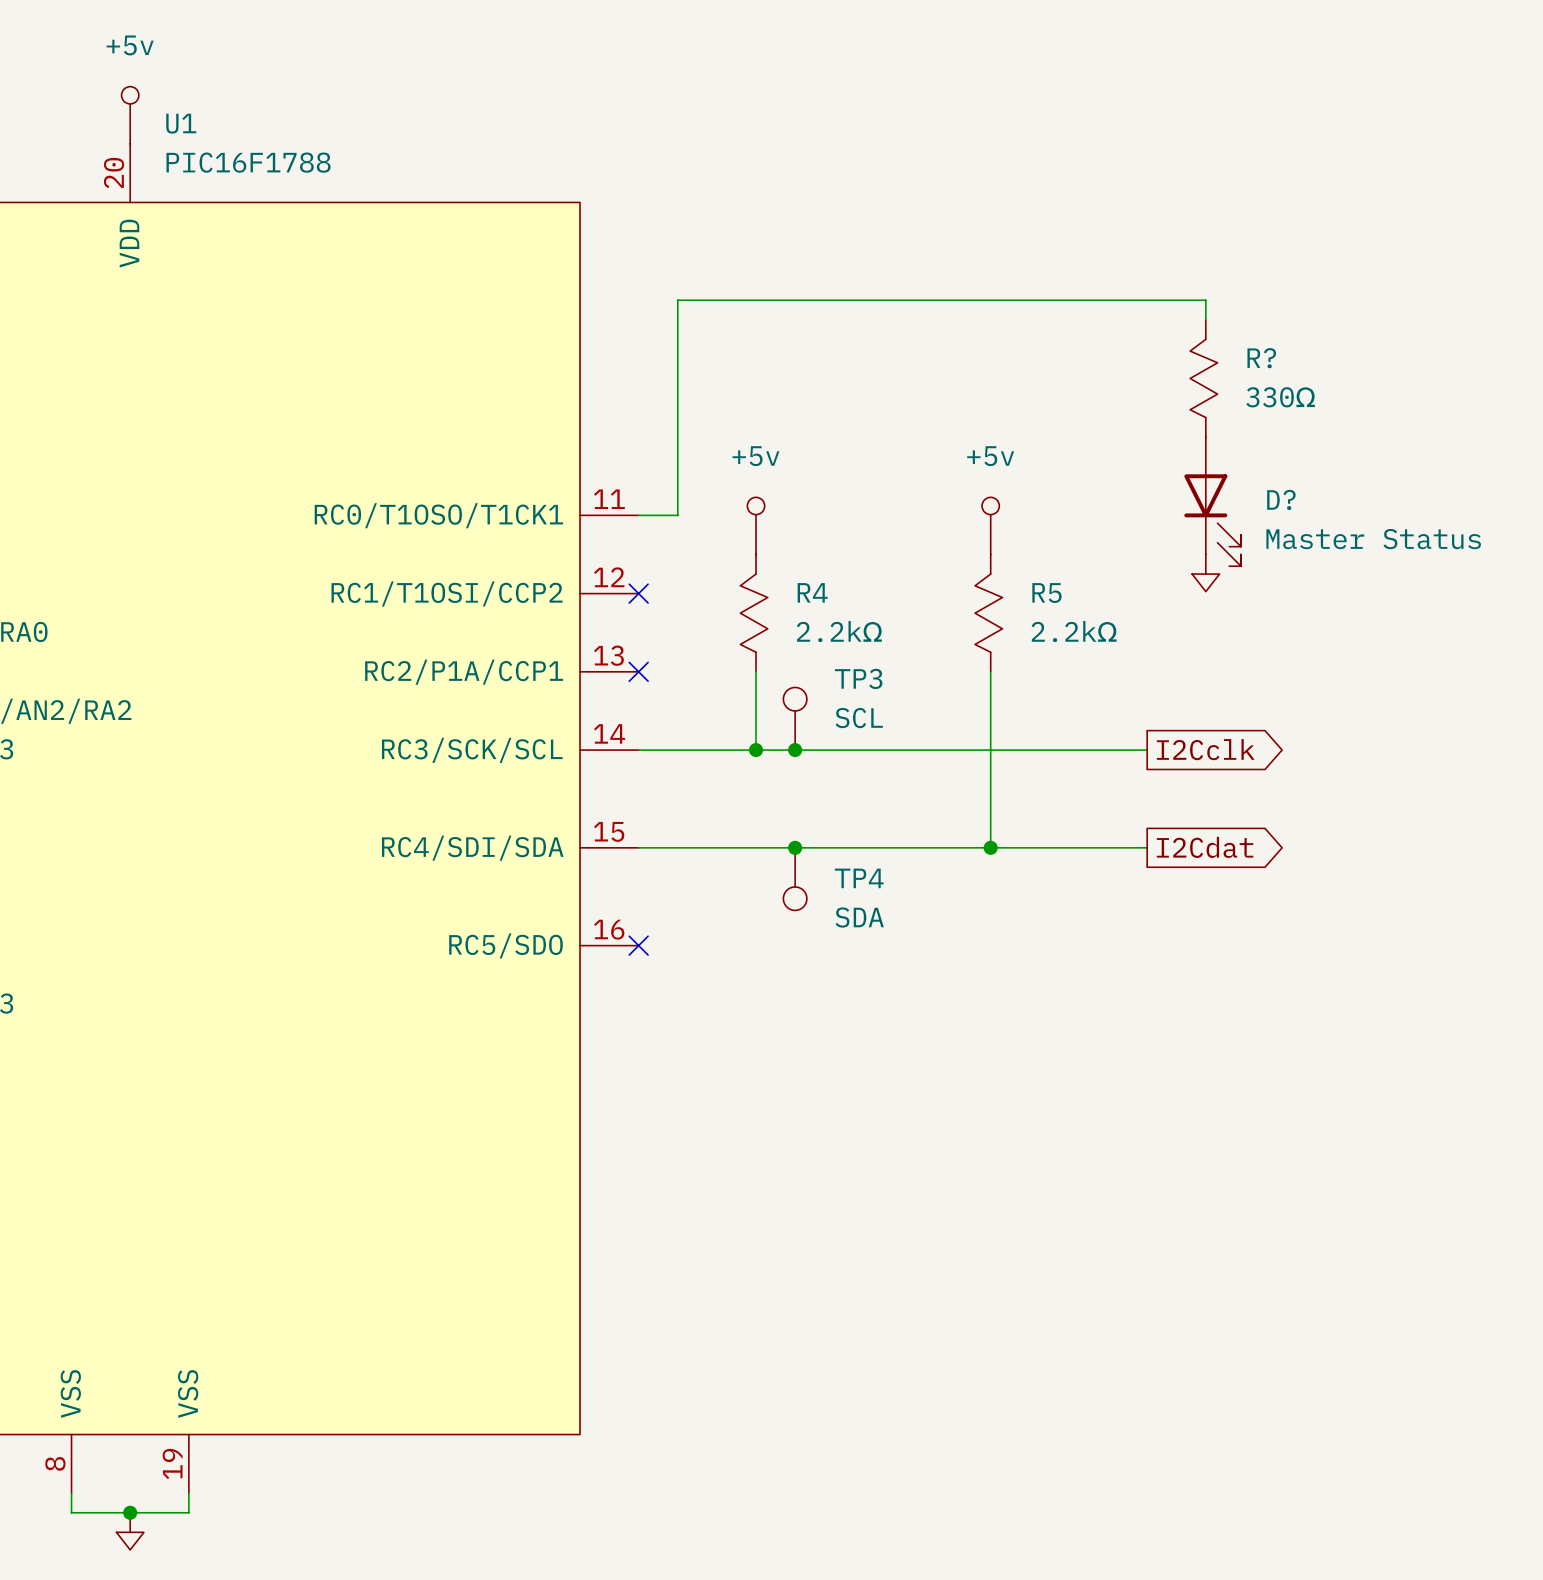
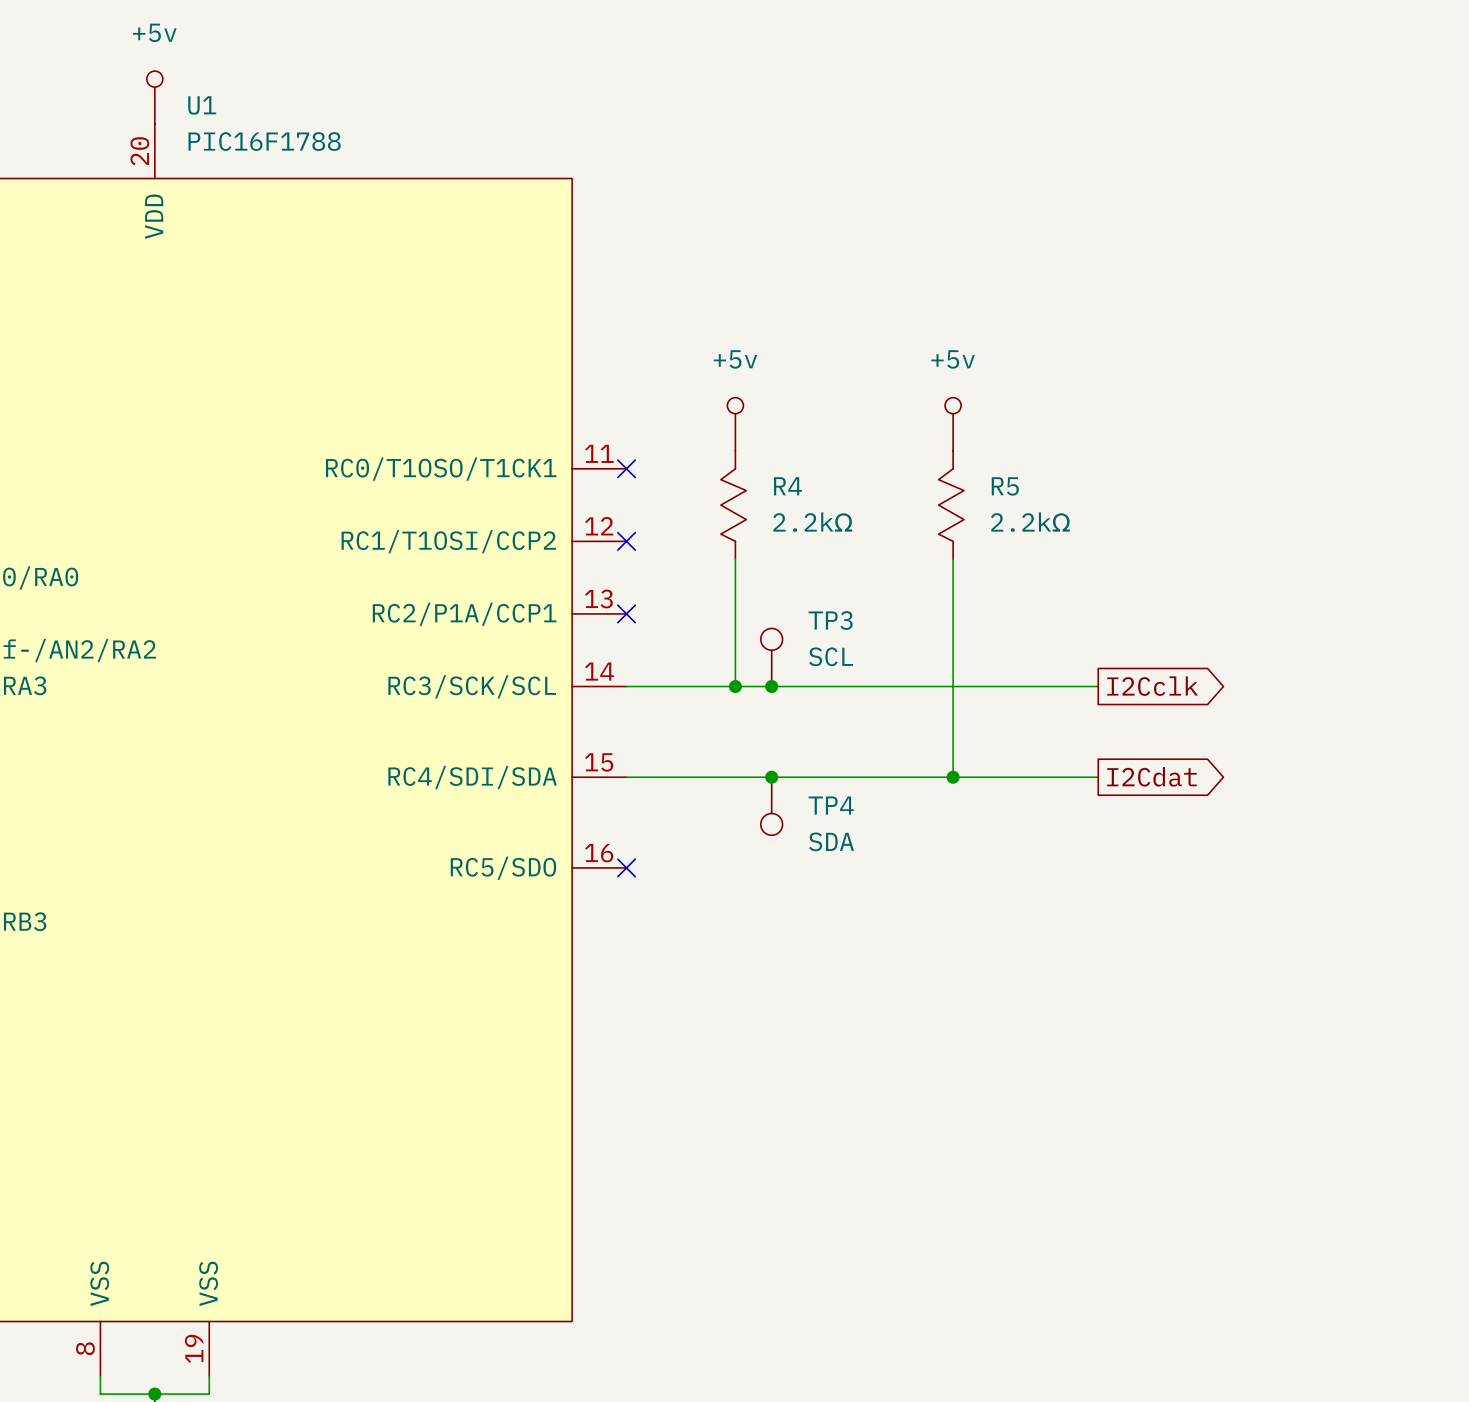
wire: (1205, 319) (1205, 300) (677, 300) (677, 515) (638, 515) -> none
R?: 330Ω (1203, 378) -> none
D?: Master Status (1212, 501) -> none
no-connect mark: none -> (626, 468)
power symbol position: +5v (756, 525) -> +5v (735, 424)
power symbol position: +5v (990, 525) -> +5v (953, 424)
power symbol: (1205, 573) -> none
R4 position: (754, 613) -> (733, 505)
wire: none -> (735, 559) (735, 613)
R5 position: (988, 613) -> (951, 505)
wire: none -> (953, 559) (953, 613)

